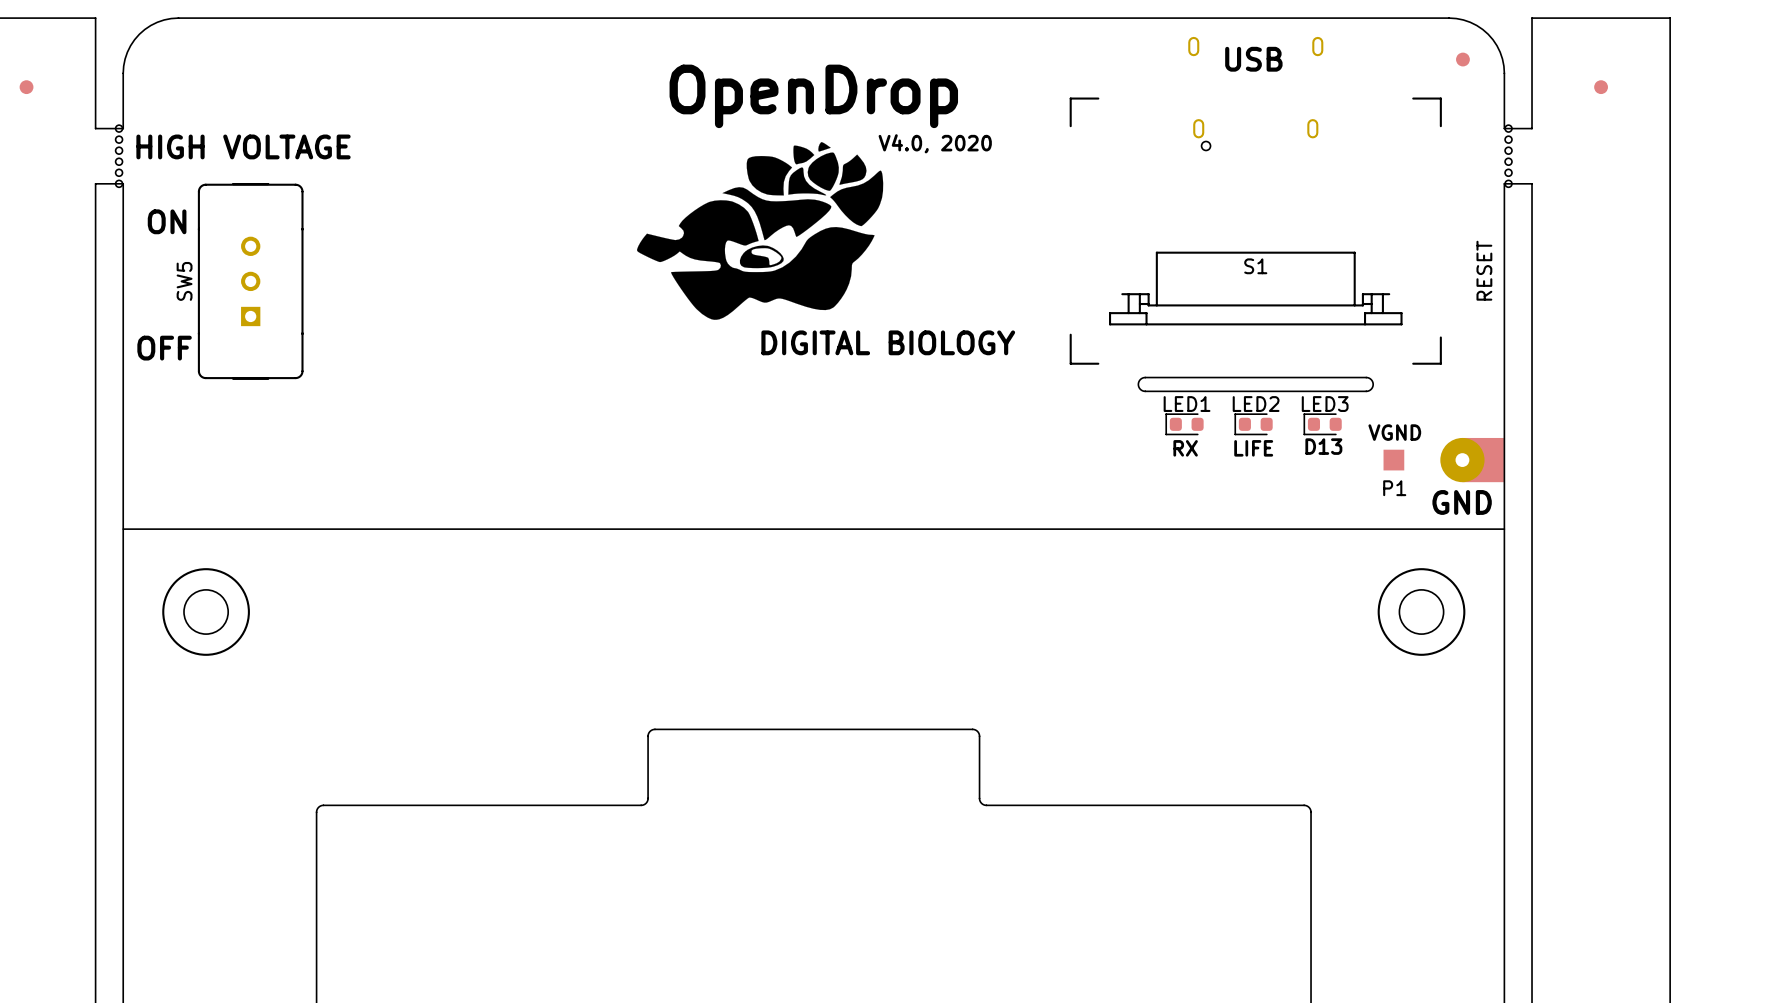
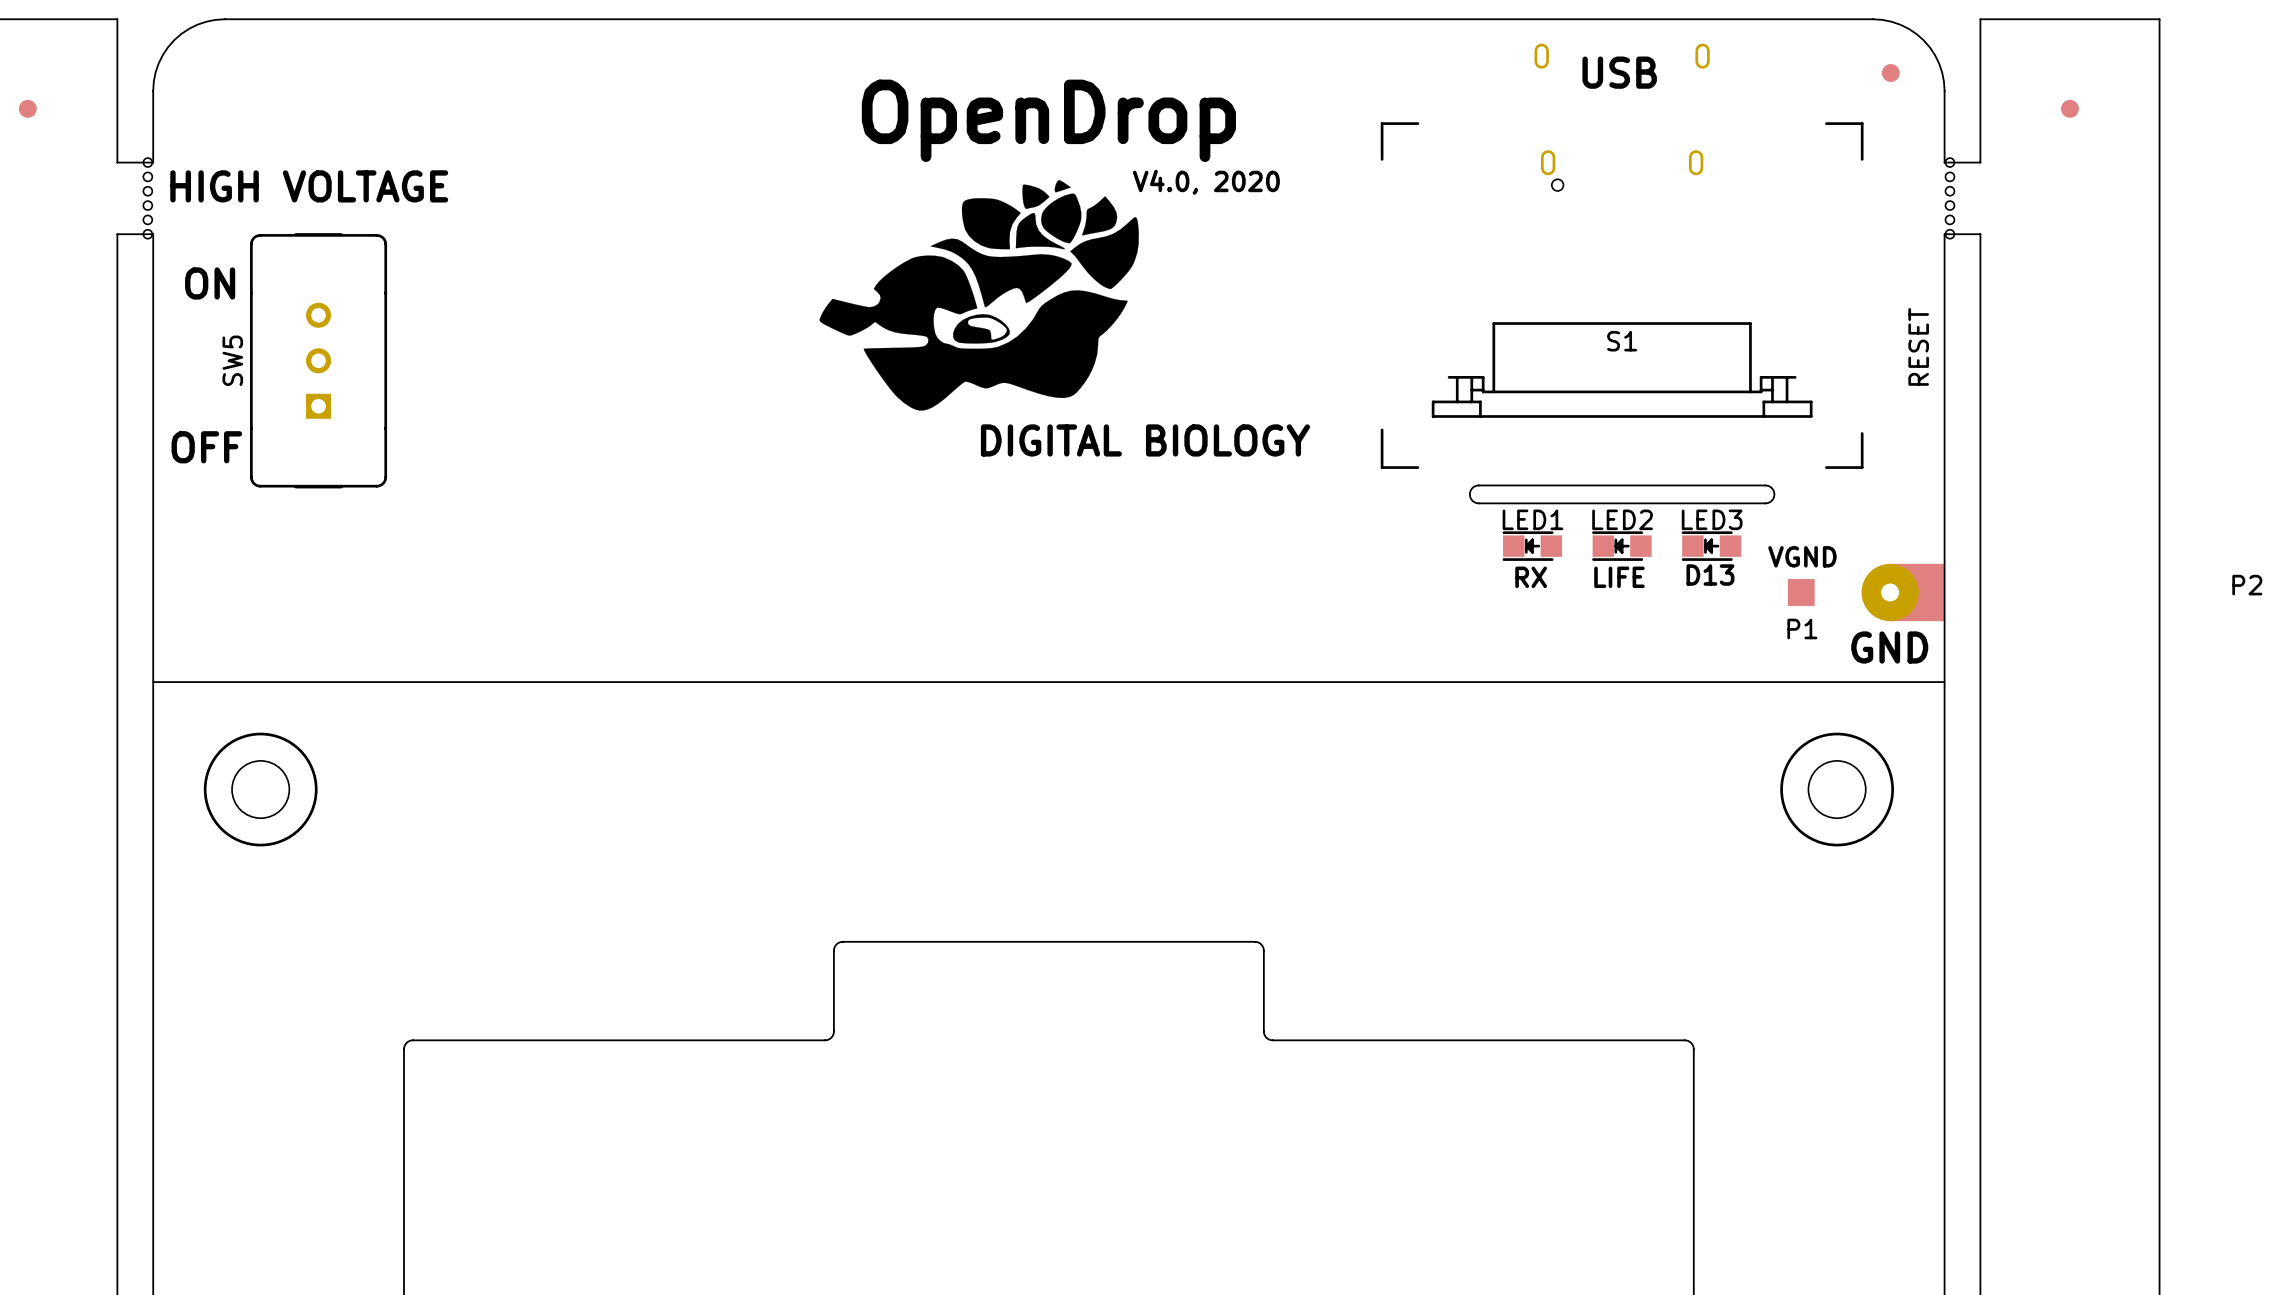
LED1 footprint: [1165, 413, 1204, 436] -> [1502, 531, 1563, 561]
LED2 footprint: [1234, 413, 1273, 436] -> [1592, 531, 1652, 561]
LED3 footprint: [1303, 413, 1342, 436] -> [1681, 531, 1742, 561]
P2 name: none -> P2 (2247, 585)

